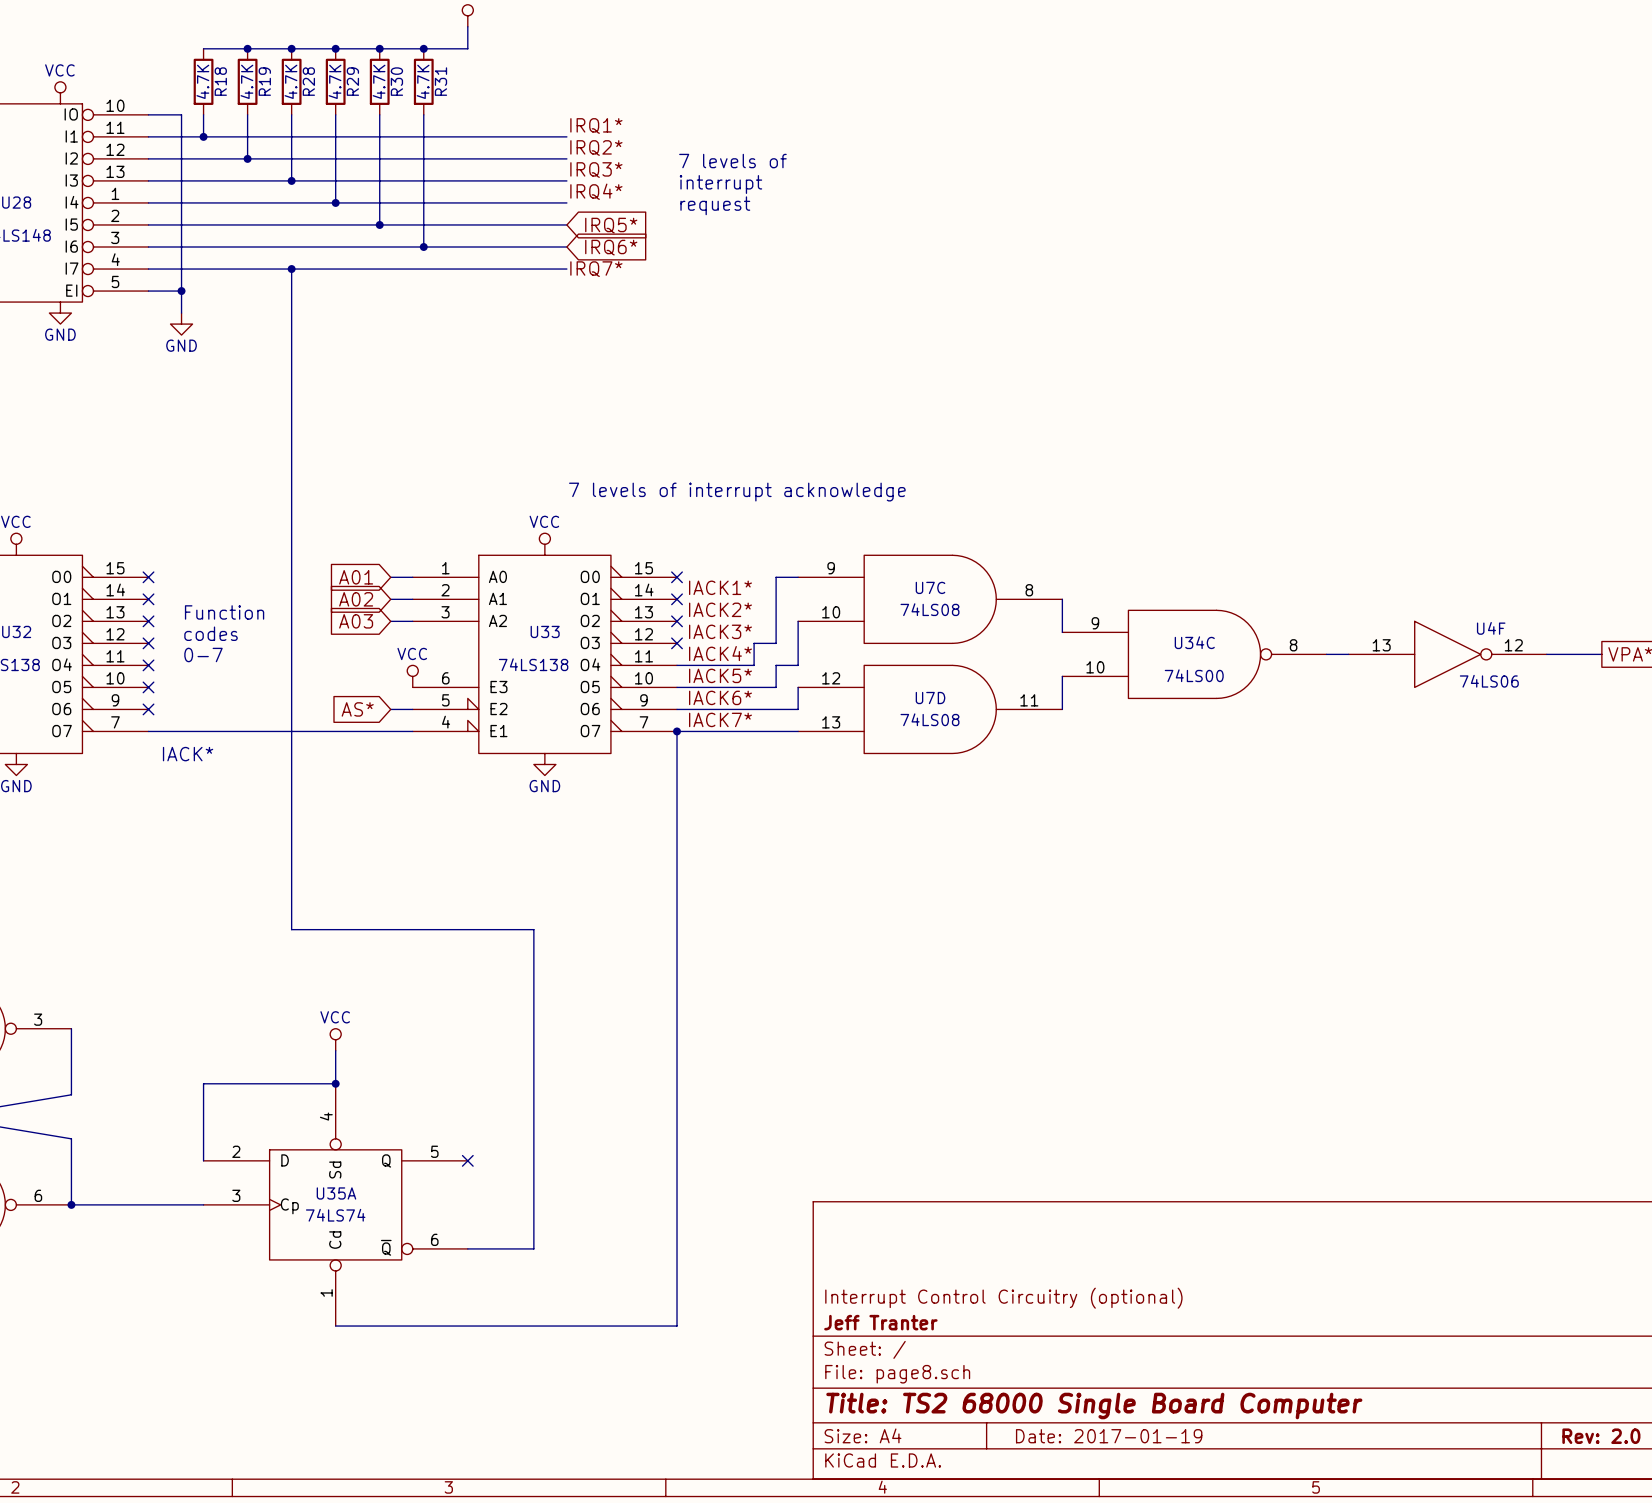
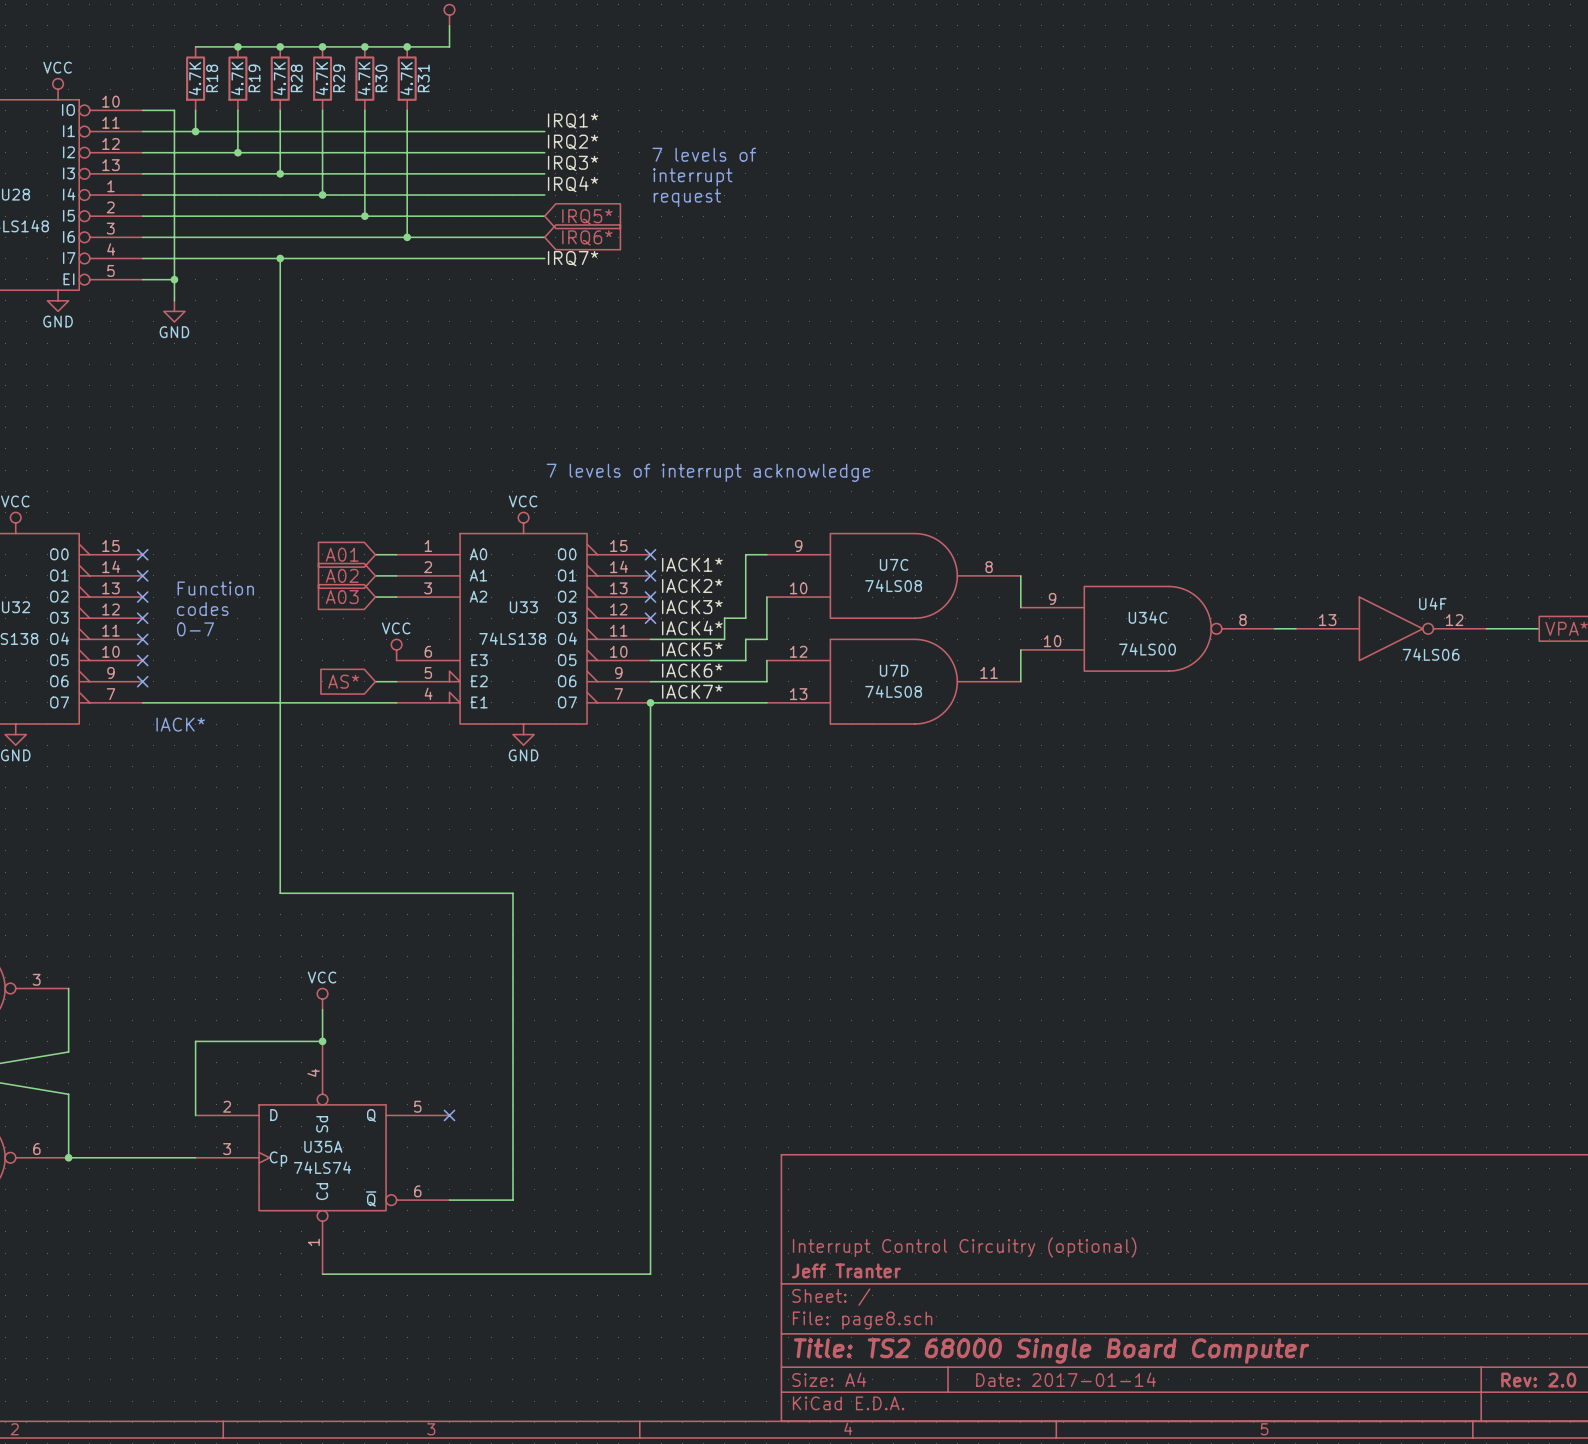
title block: Date: 2017-01-19 (1109, 1436) -> Date: 2017-01-14 (1066, 1379)

